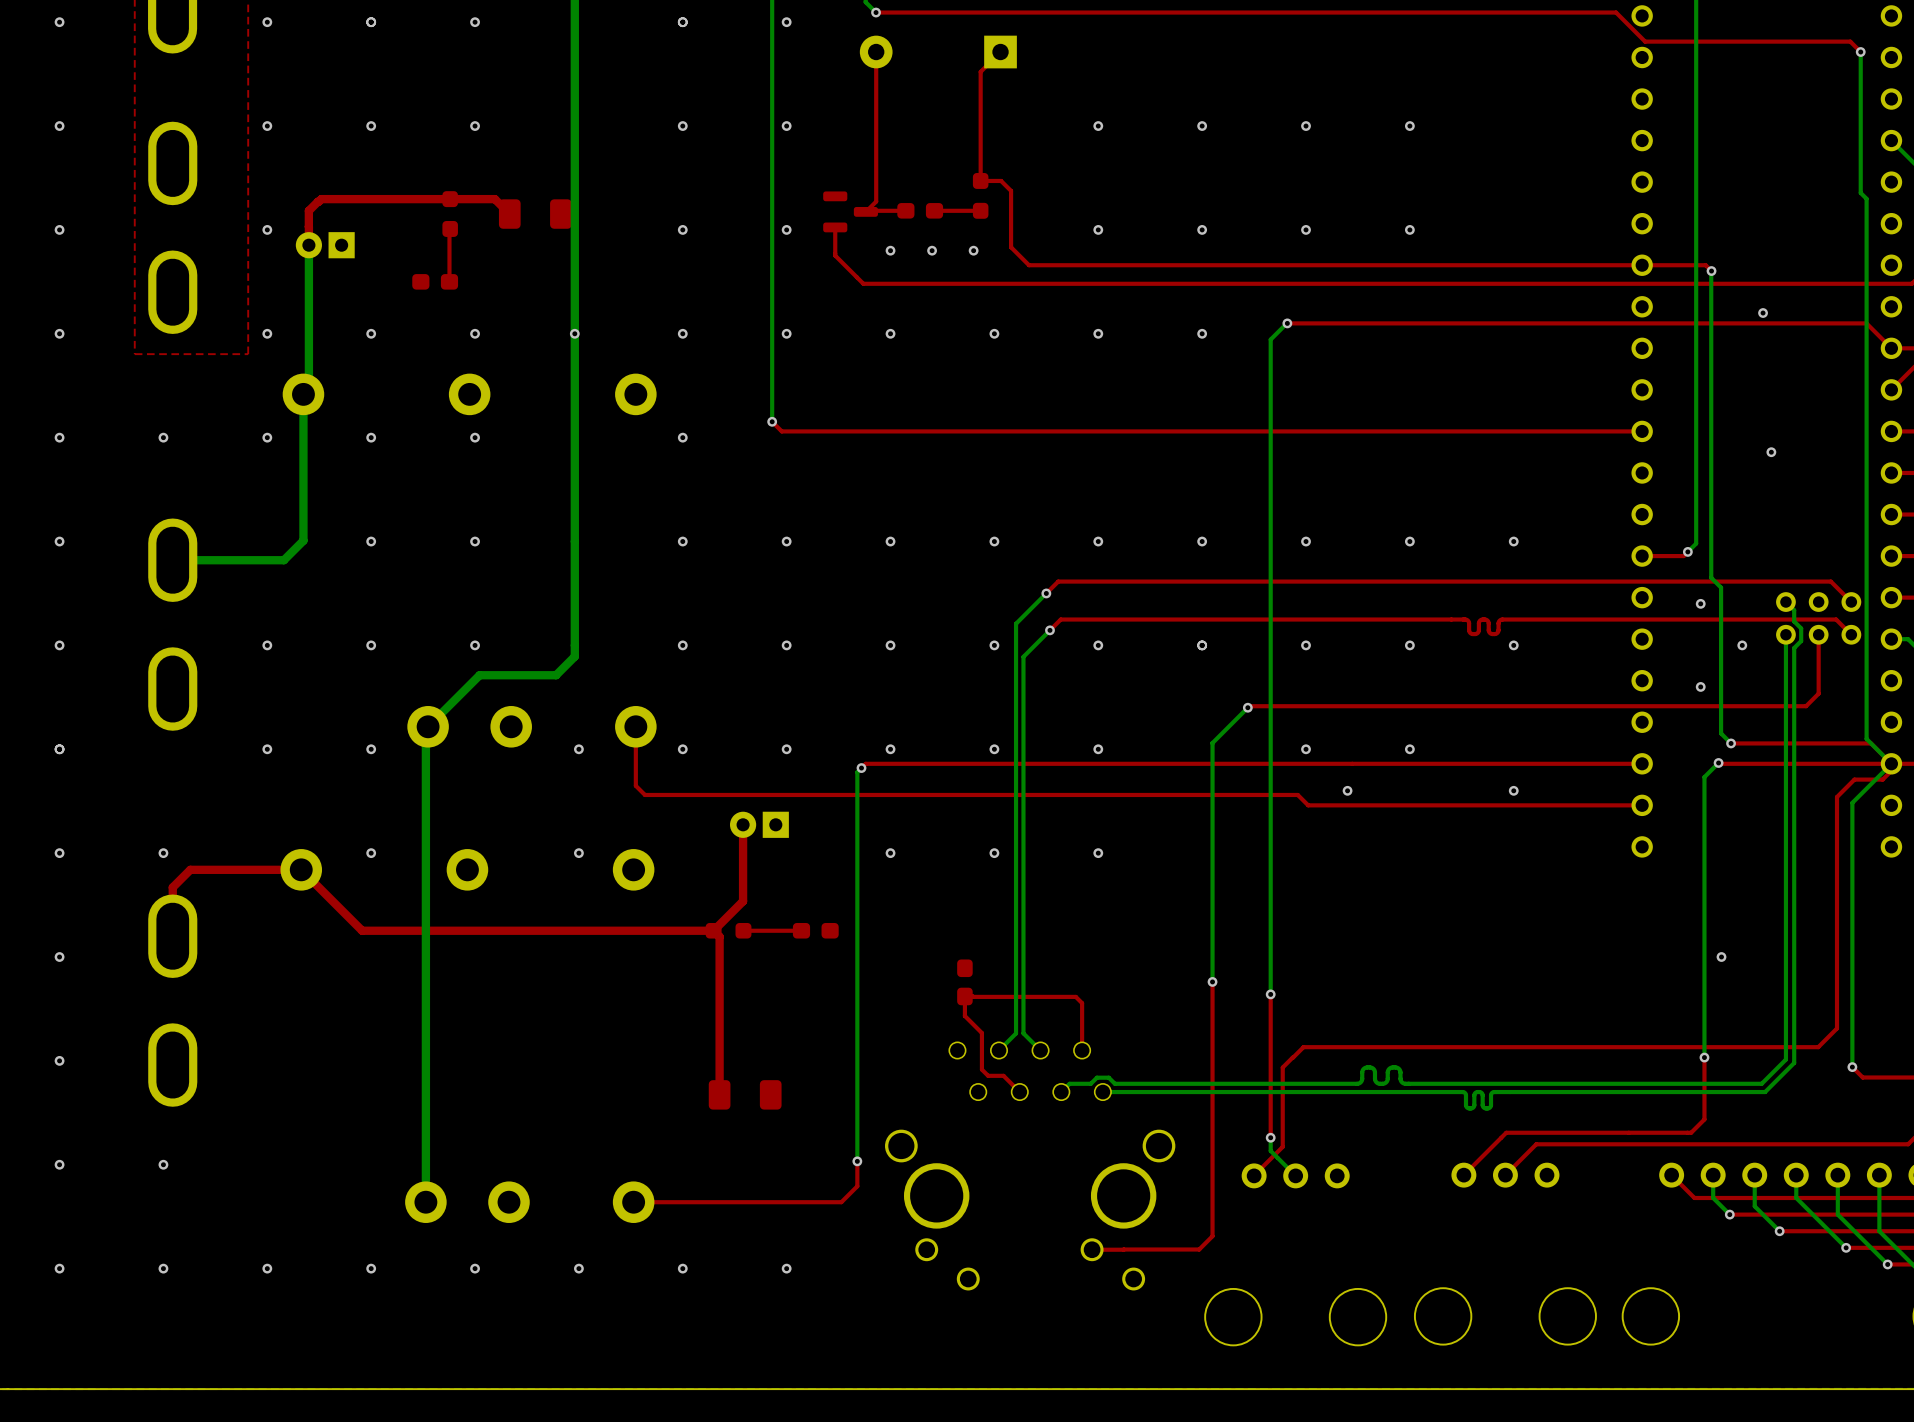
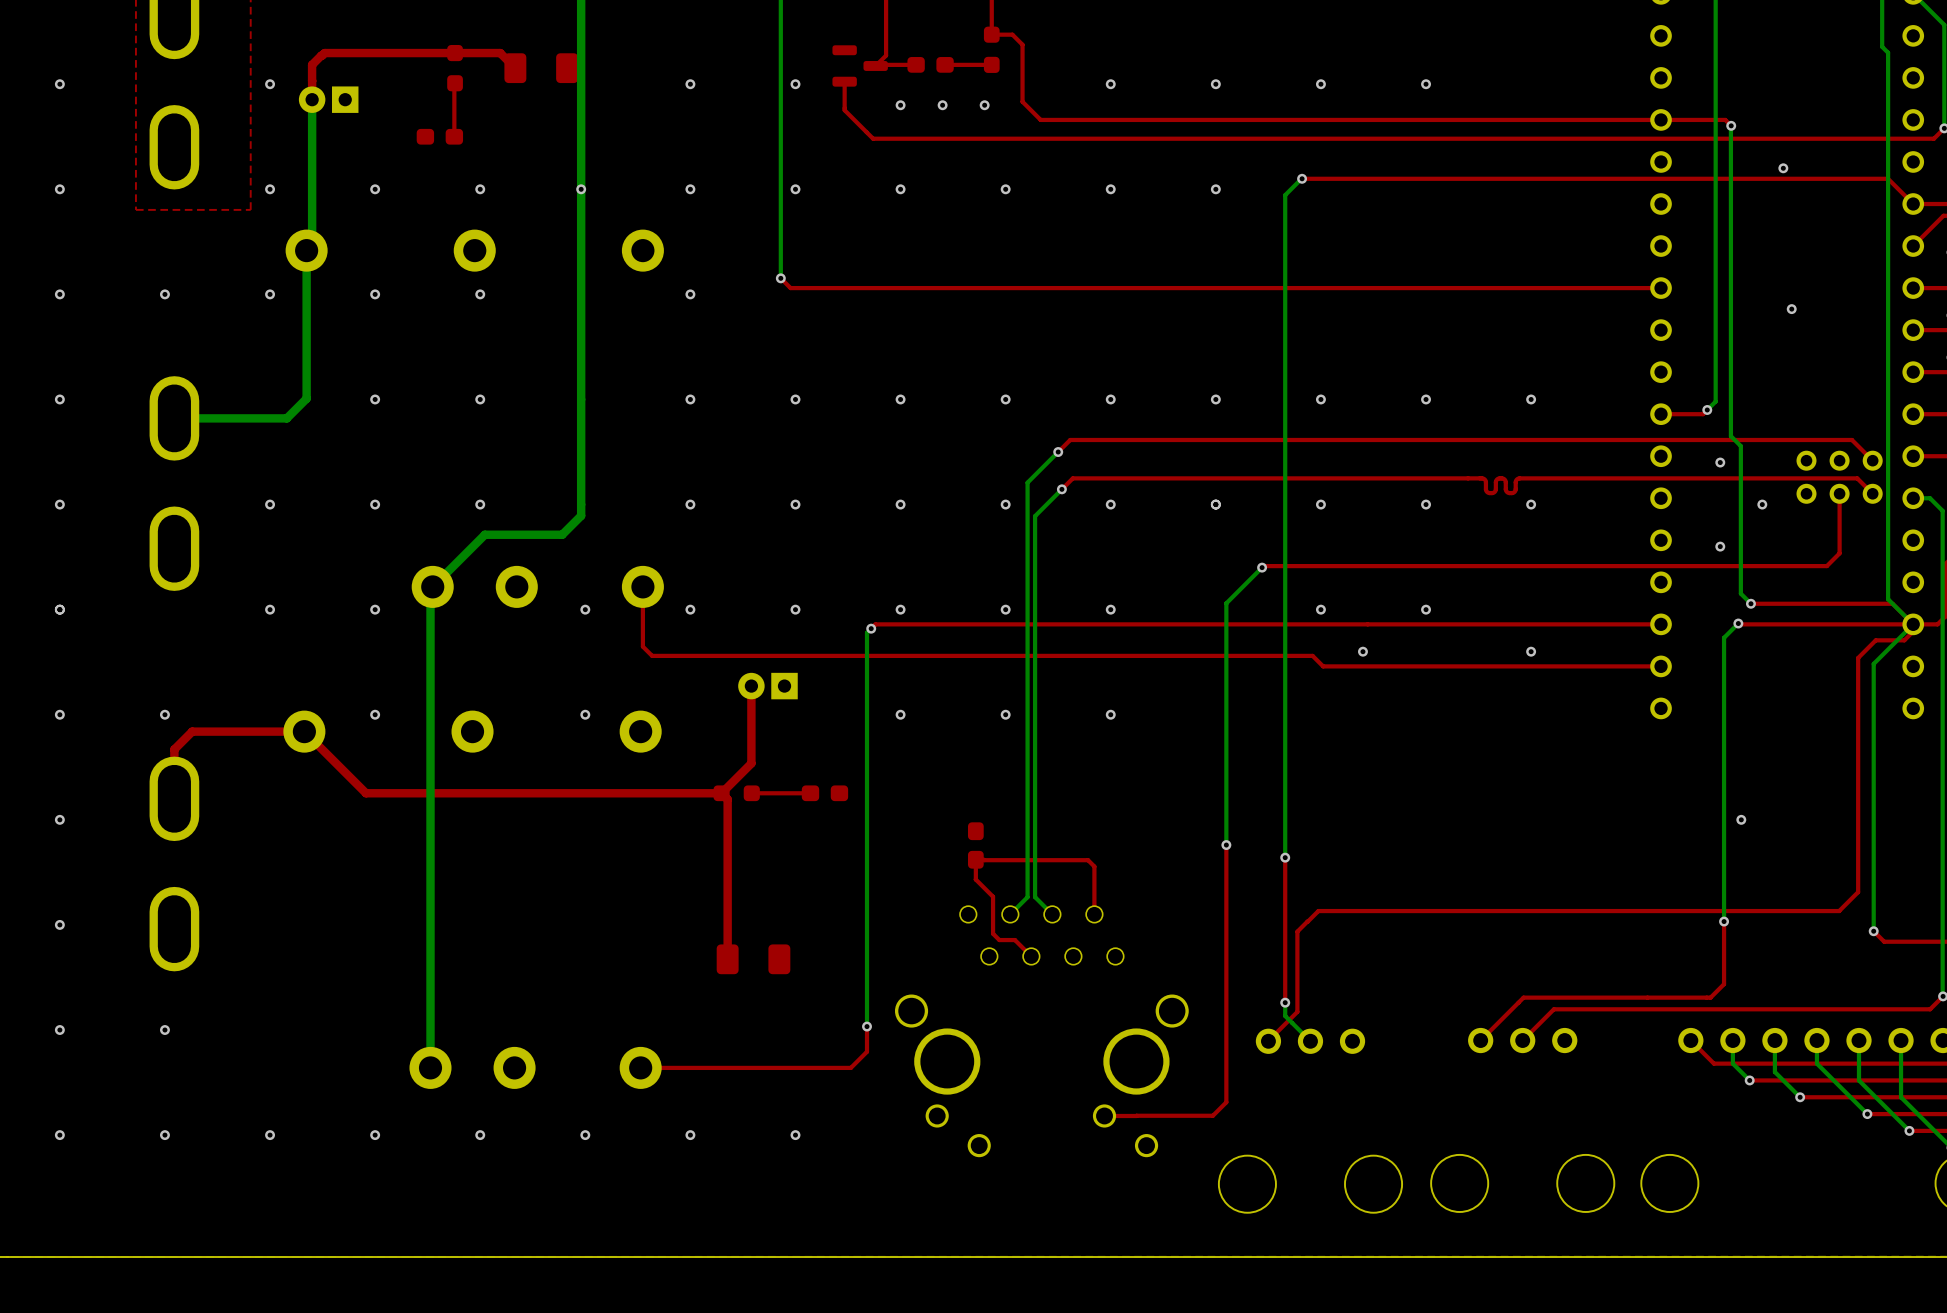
bottom track: (1785, 602) (1794, 610) (1794, 621) (1801, 628) (1801, 641) (1794, 648) (1794, 1062) (1765, 1092) (1493, 1092) (1491, 1094) (1490, 1106) (1487, 1108) (1483, 1106) (1482, 1094) (1479, 1092) (1474, 1093) (1474, 1105) (1470, 1108) (1466, 1106) (1465, 1094) (1462, 1092) (1102, 1092) -> none
bottom track: (1785, 634) (1785, 1059) (1761, 1083) (1405, 1083) (1401, 1081) (1400, 1070) (1395, 1067) (1388, 1069) (1386, 1082) (1380, 1083) (1375, 1080) (1373, 1069) (1367, 1067) (1362, 1069) (1361, 1080) (1357, 1083) (1114, 1083) (1108, 1077) (1096, 1077) (1090, 1083) (1069, 1083) (1061, 1092) -> none

